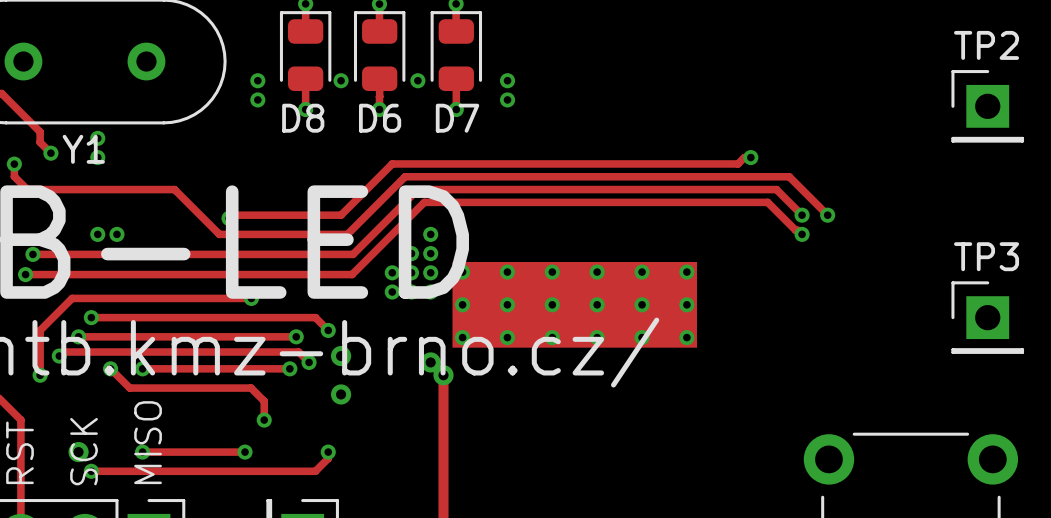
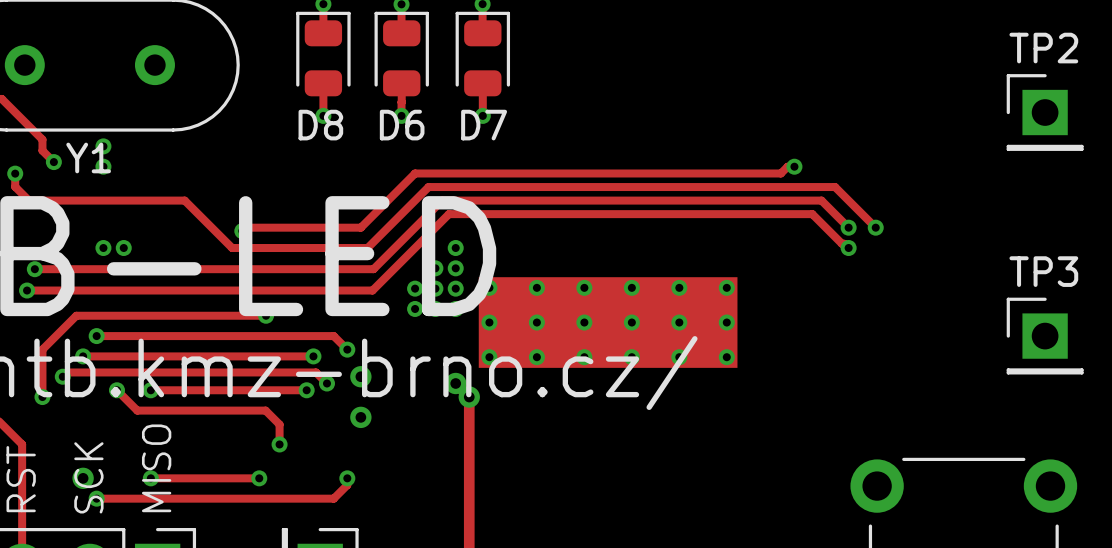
via: (257, 80) -> none
via: (341, 80) -> none
via: (417, 80) -> none
via: (507, 80) -> none
via: (257, 99) -> none
via: (507, 99) -> none

